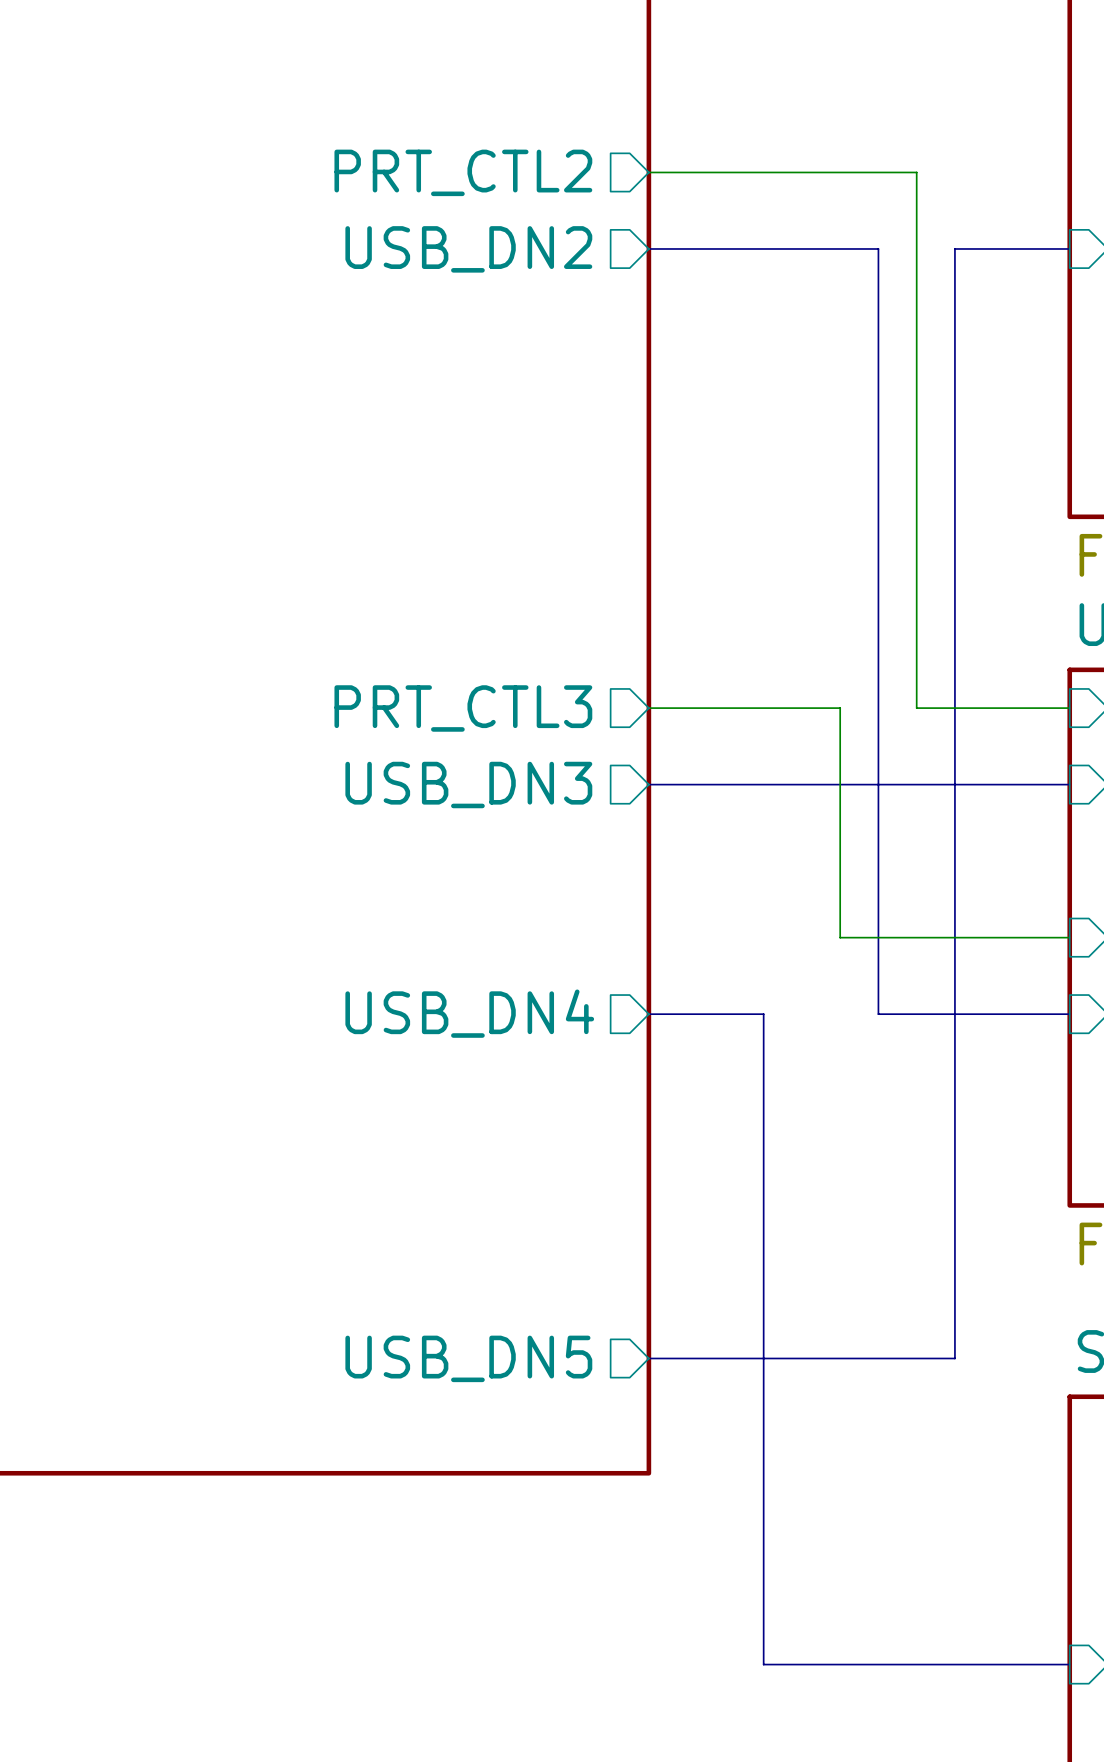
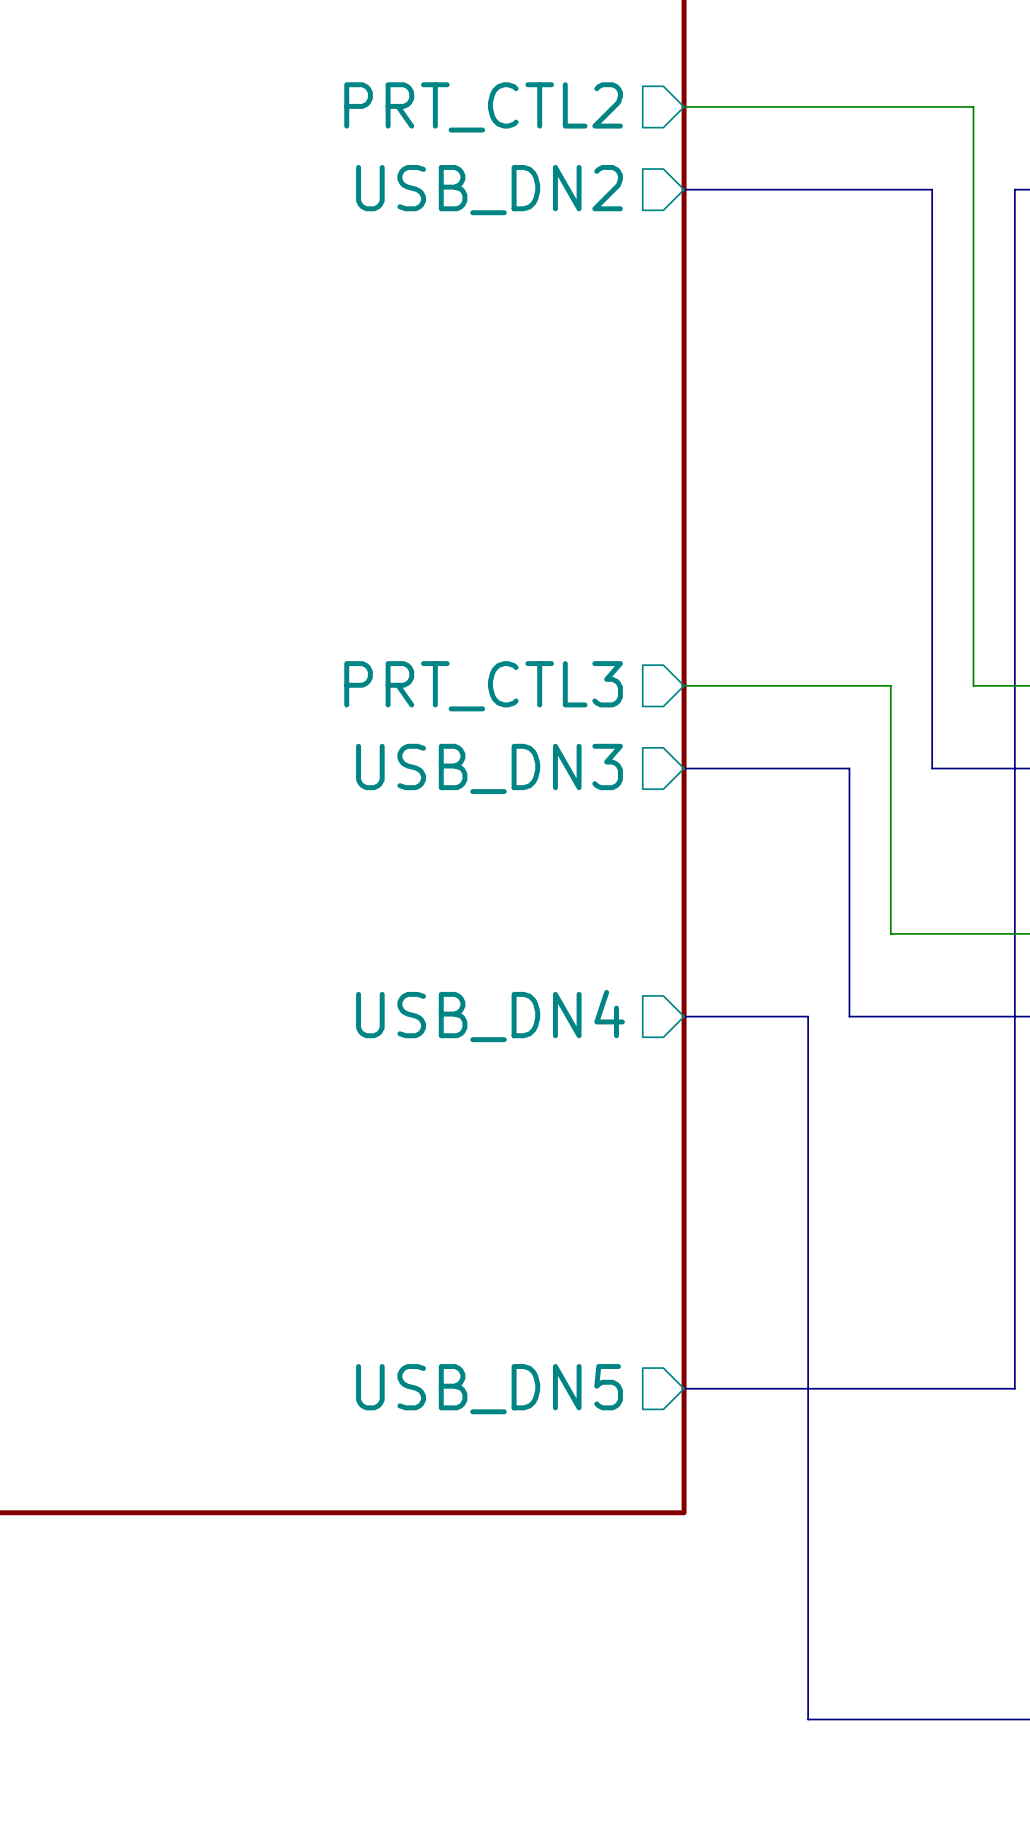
bus: (801, 784) (878, 784) (878, 1014) -> (849, 768) (849, 1016) (932, 1016)

